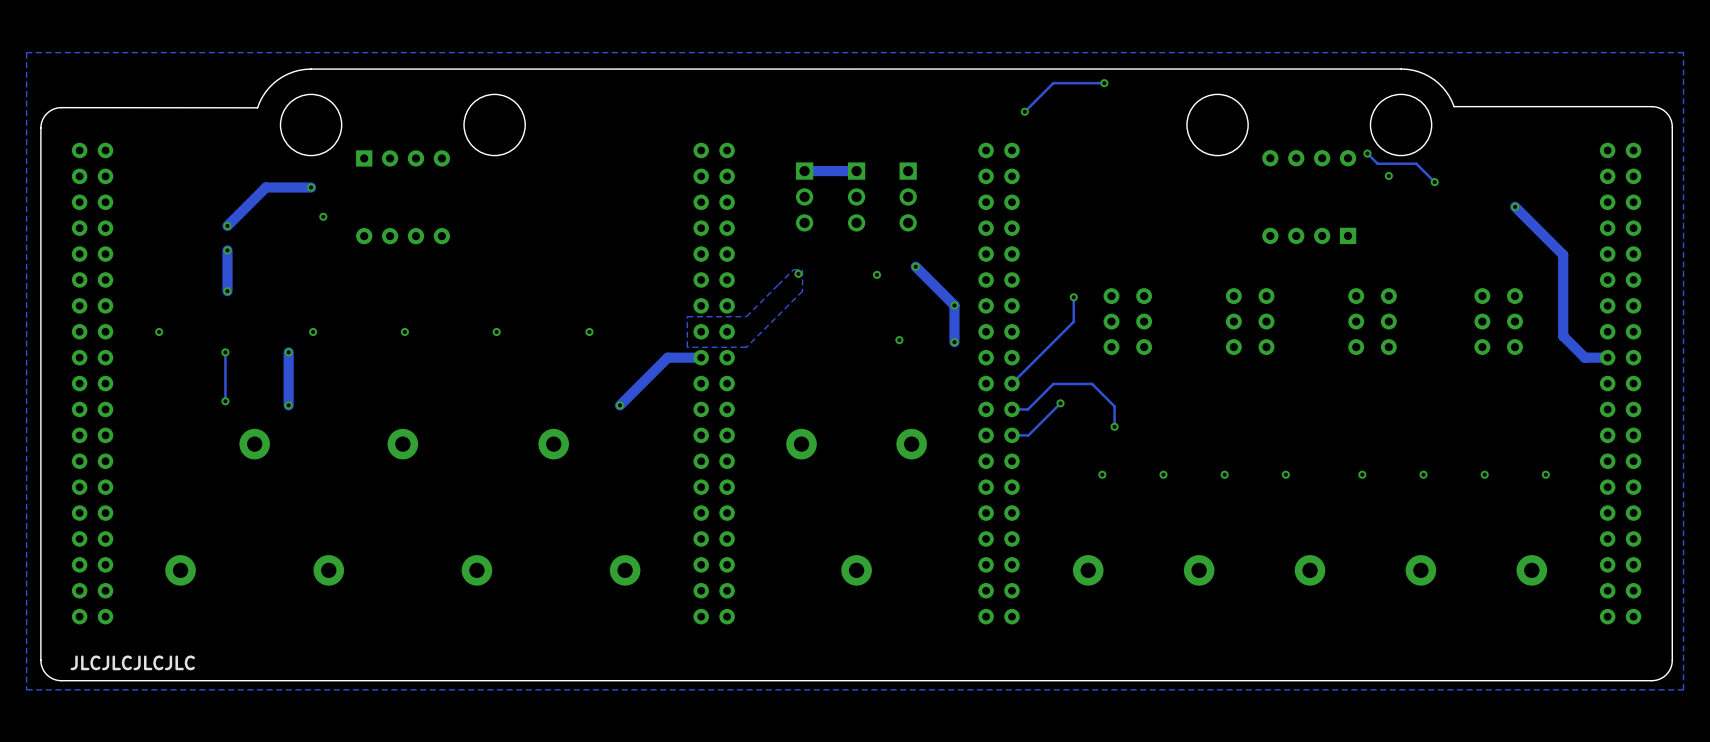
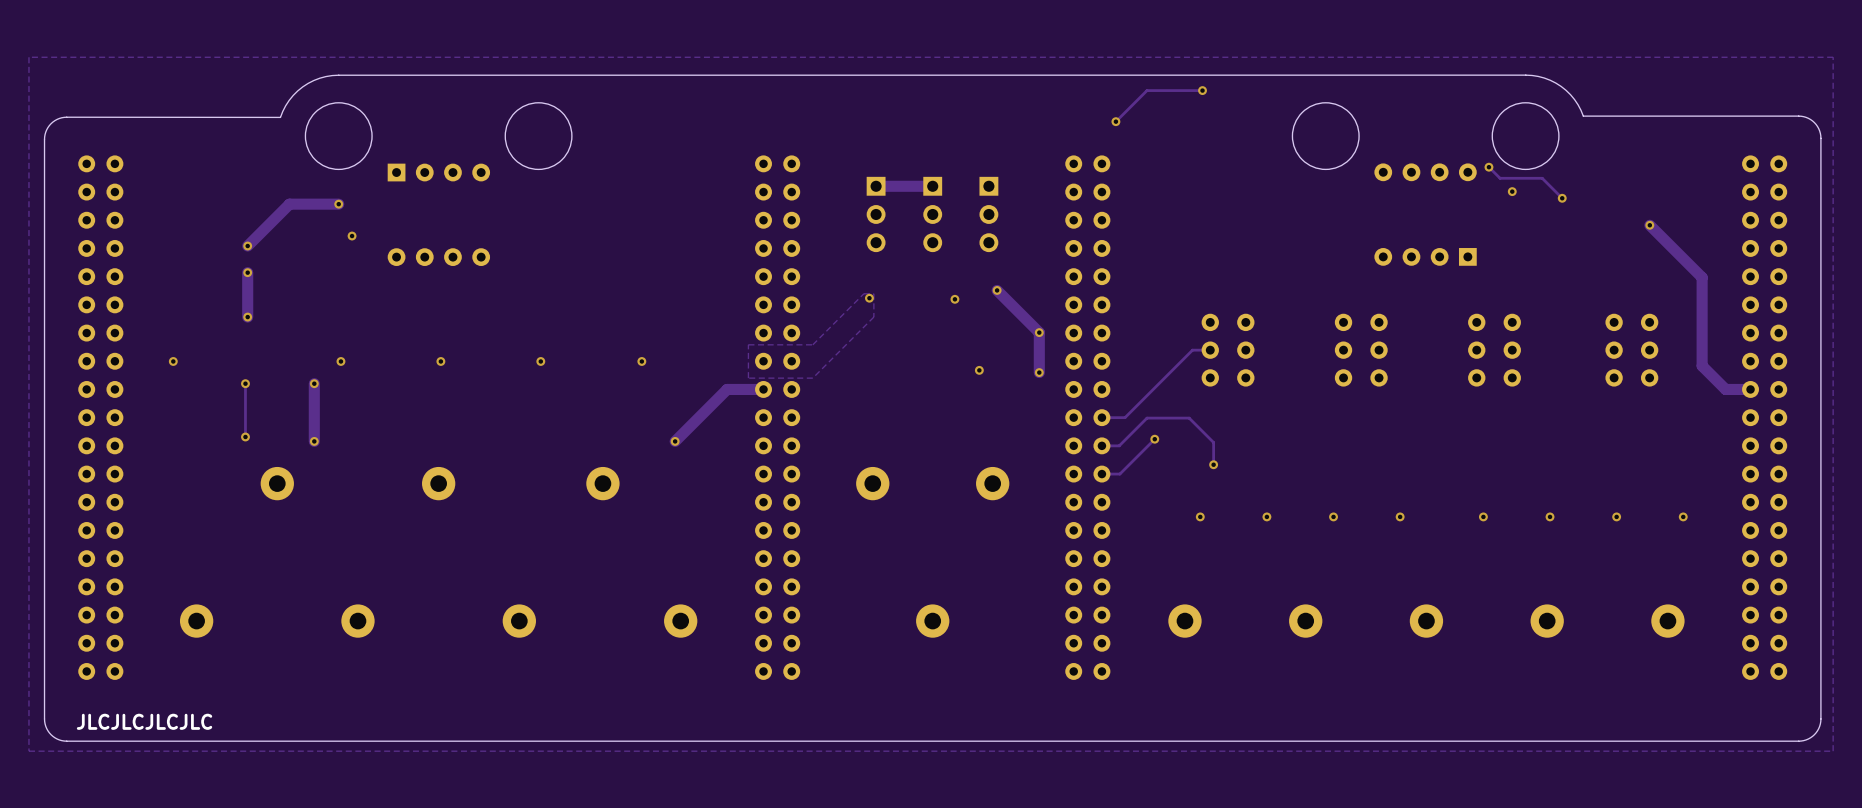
track: (1073, 297) (1073, 321) (1011, 383) -> (1210, 350) (1192, 350) (1125, 417) (1101, 417)
via: (1073, 297) -> none

